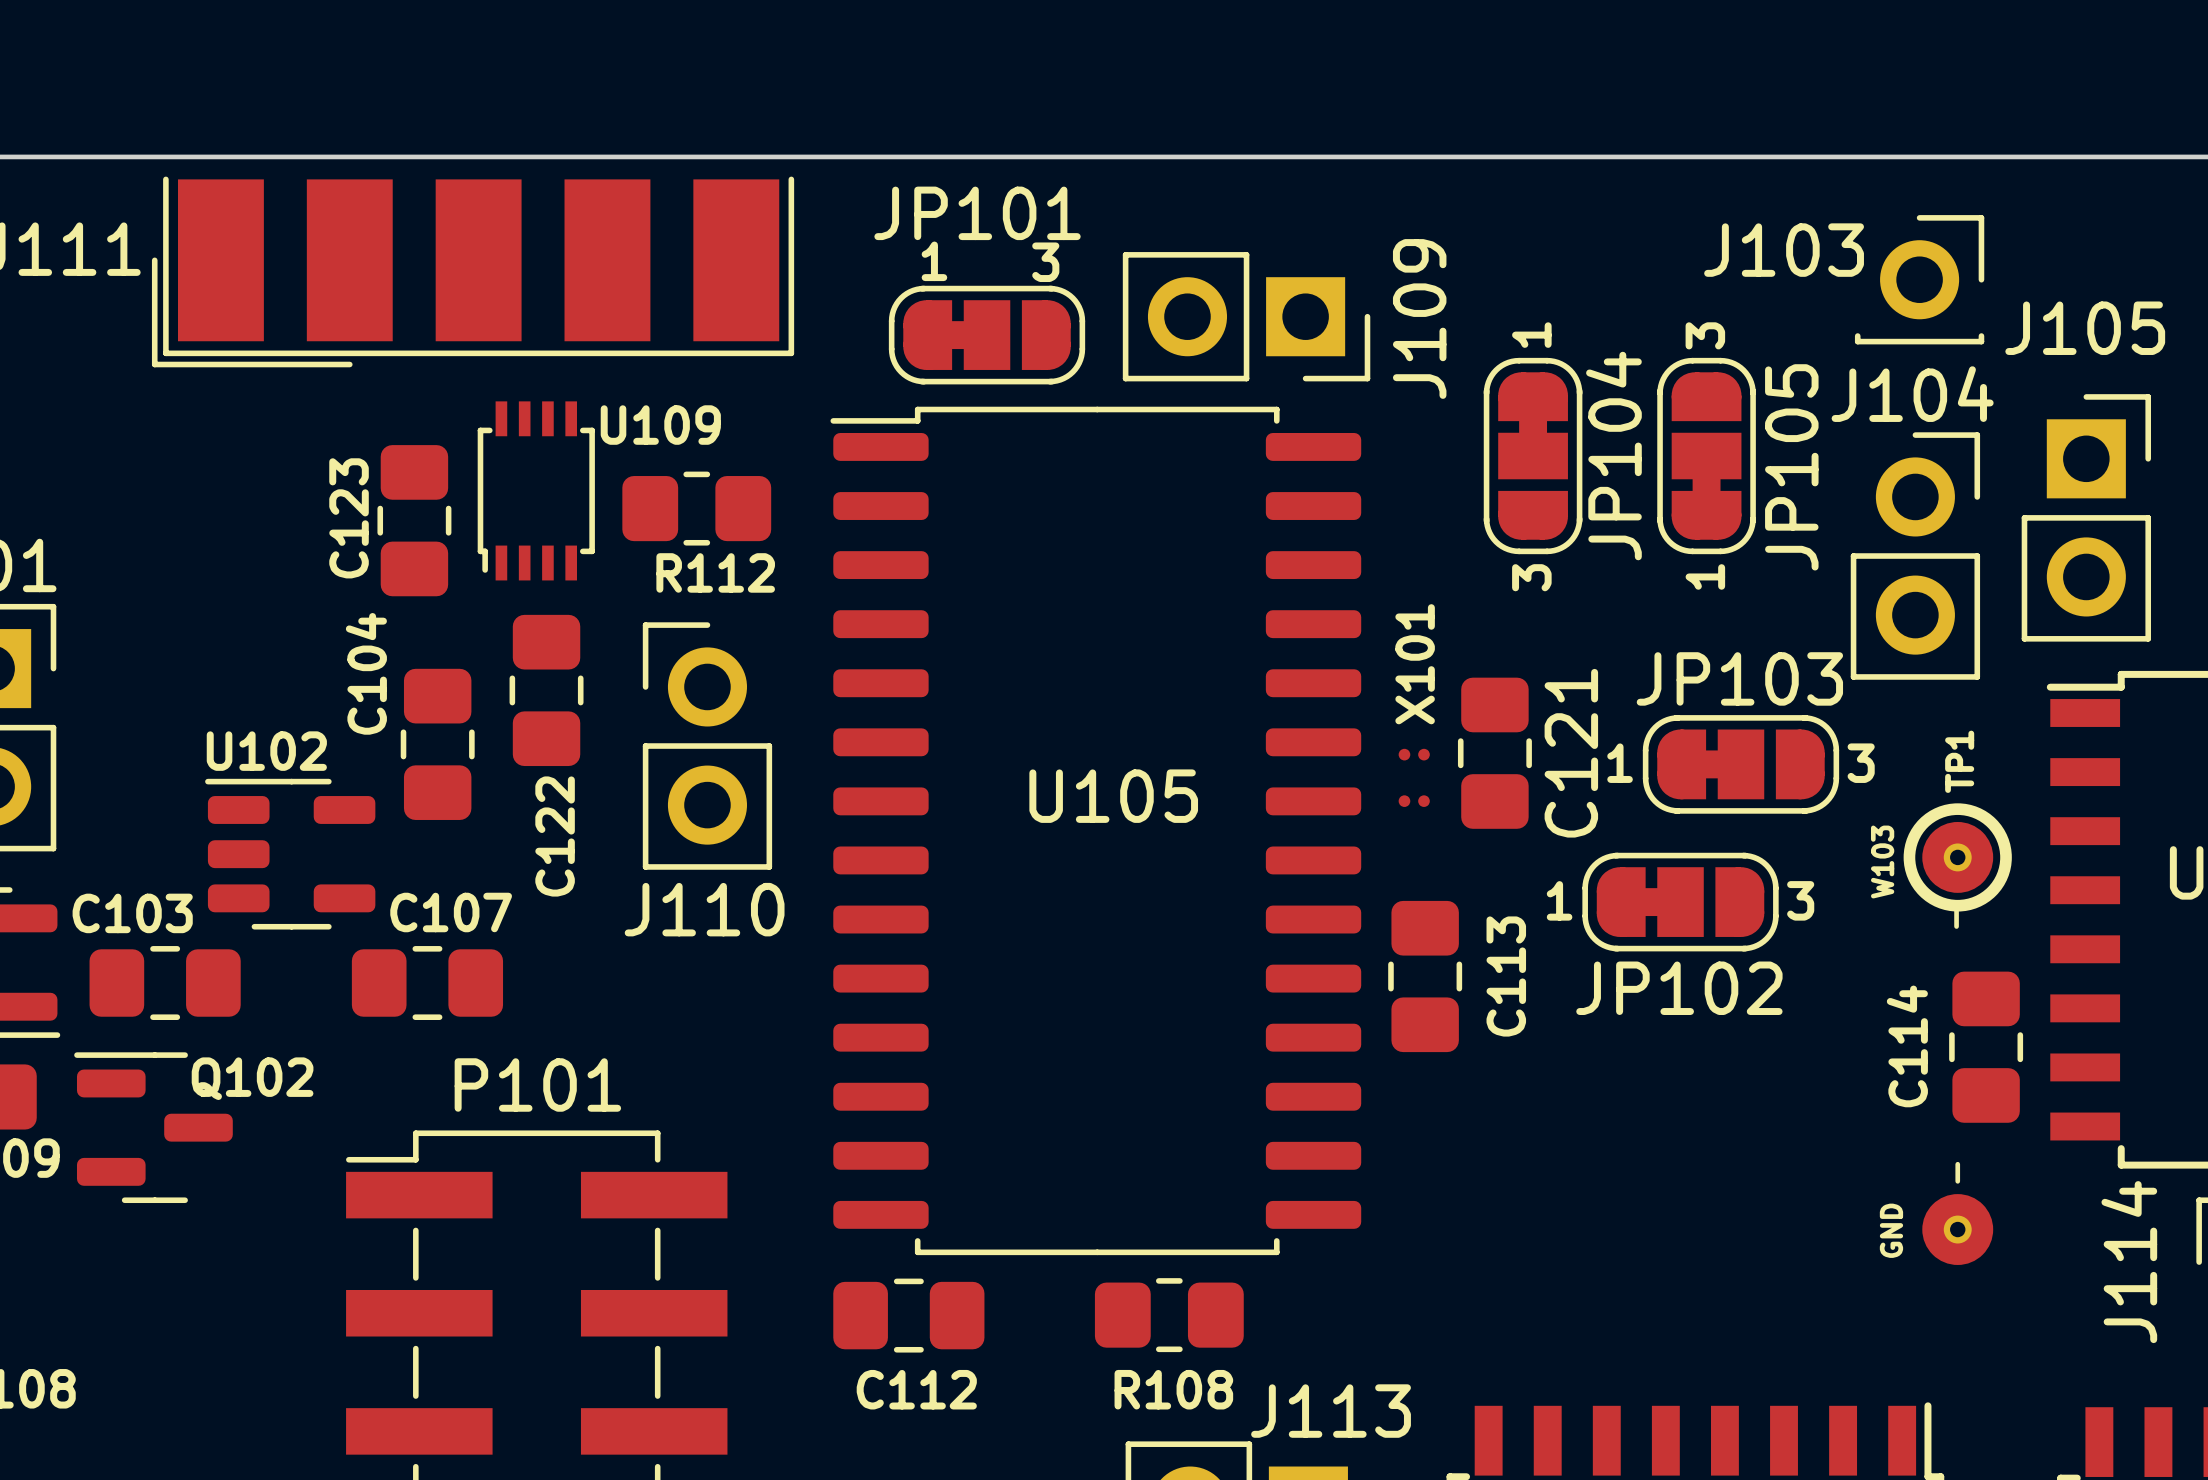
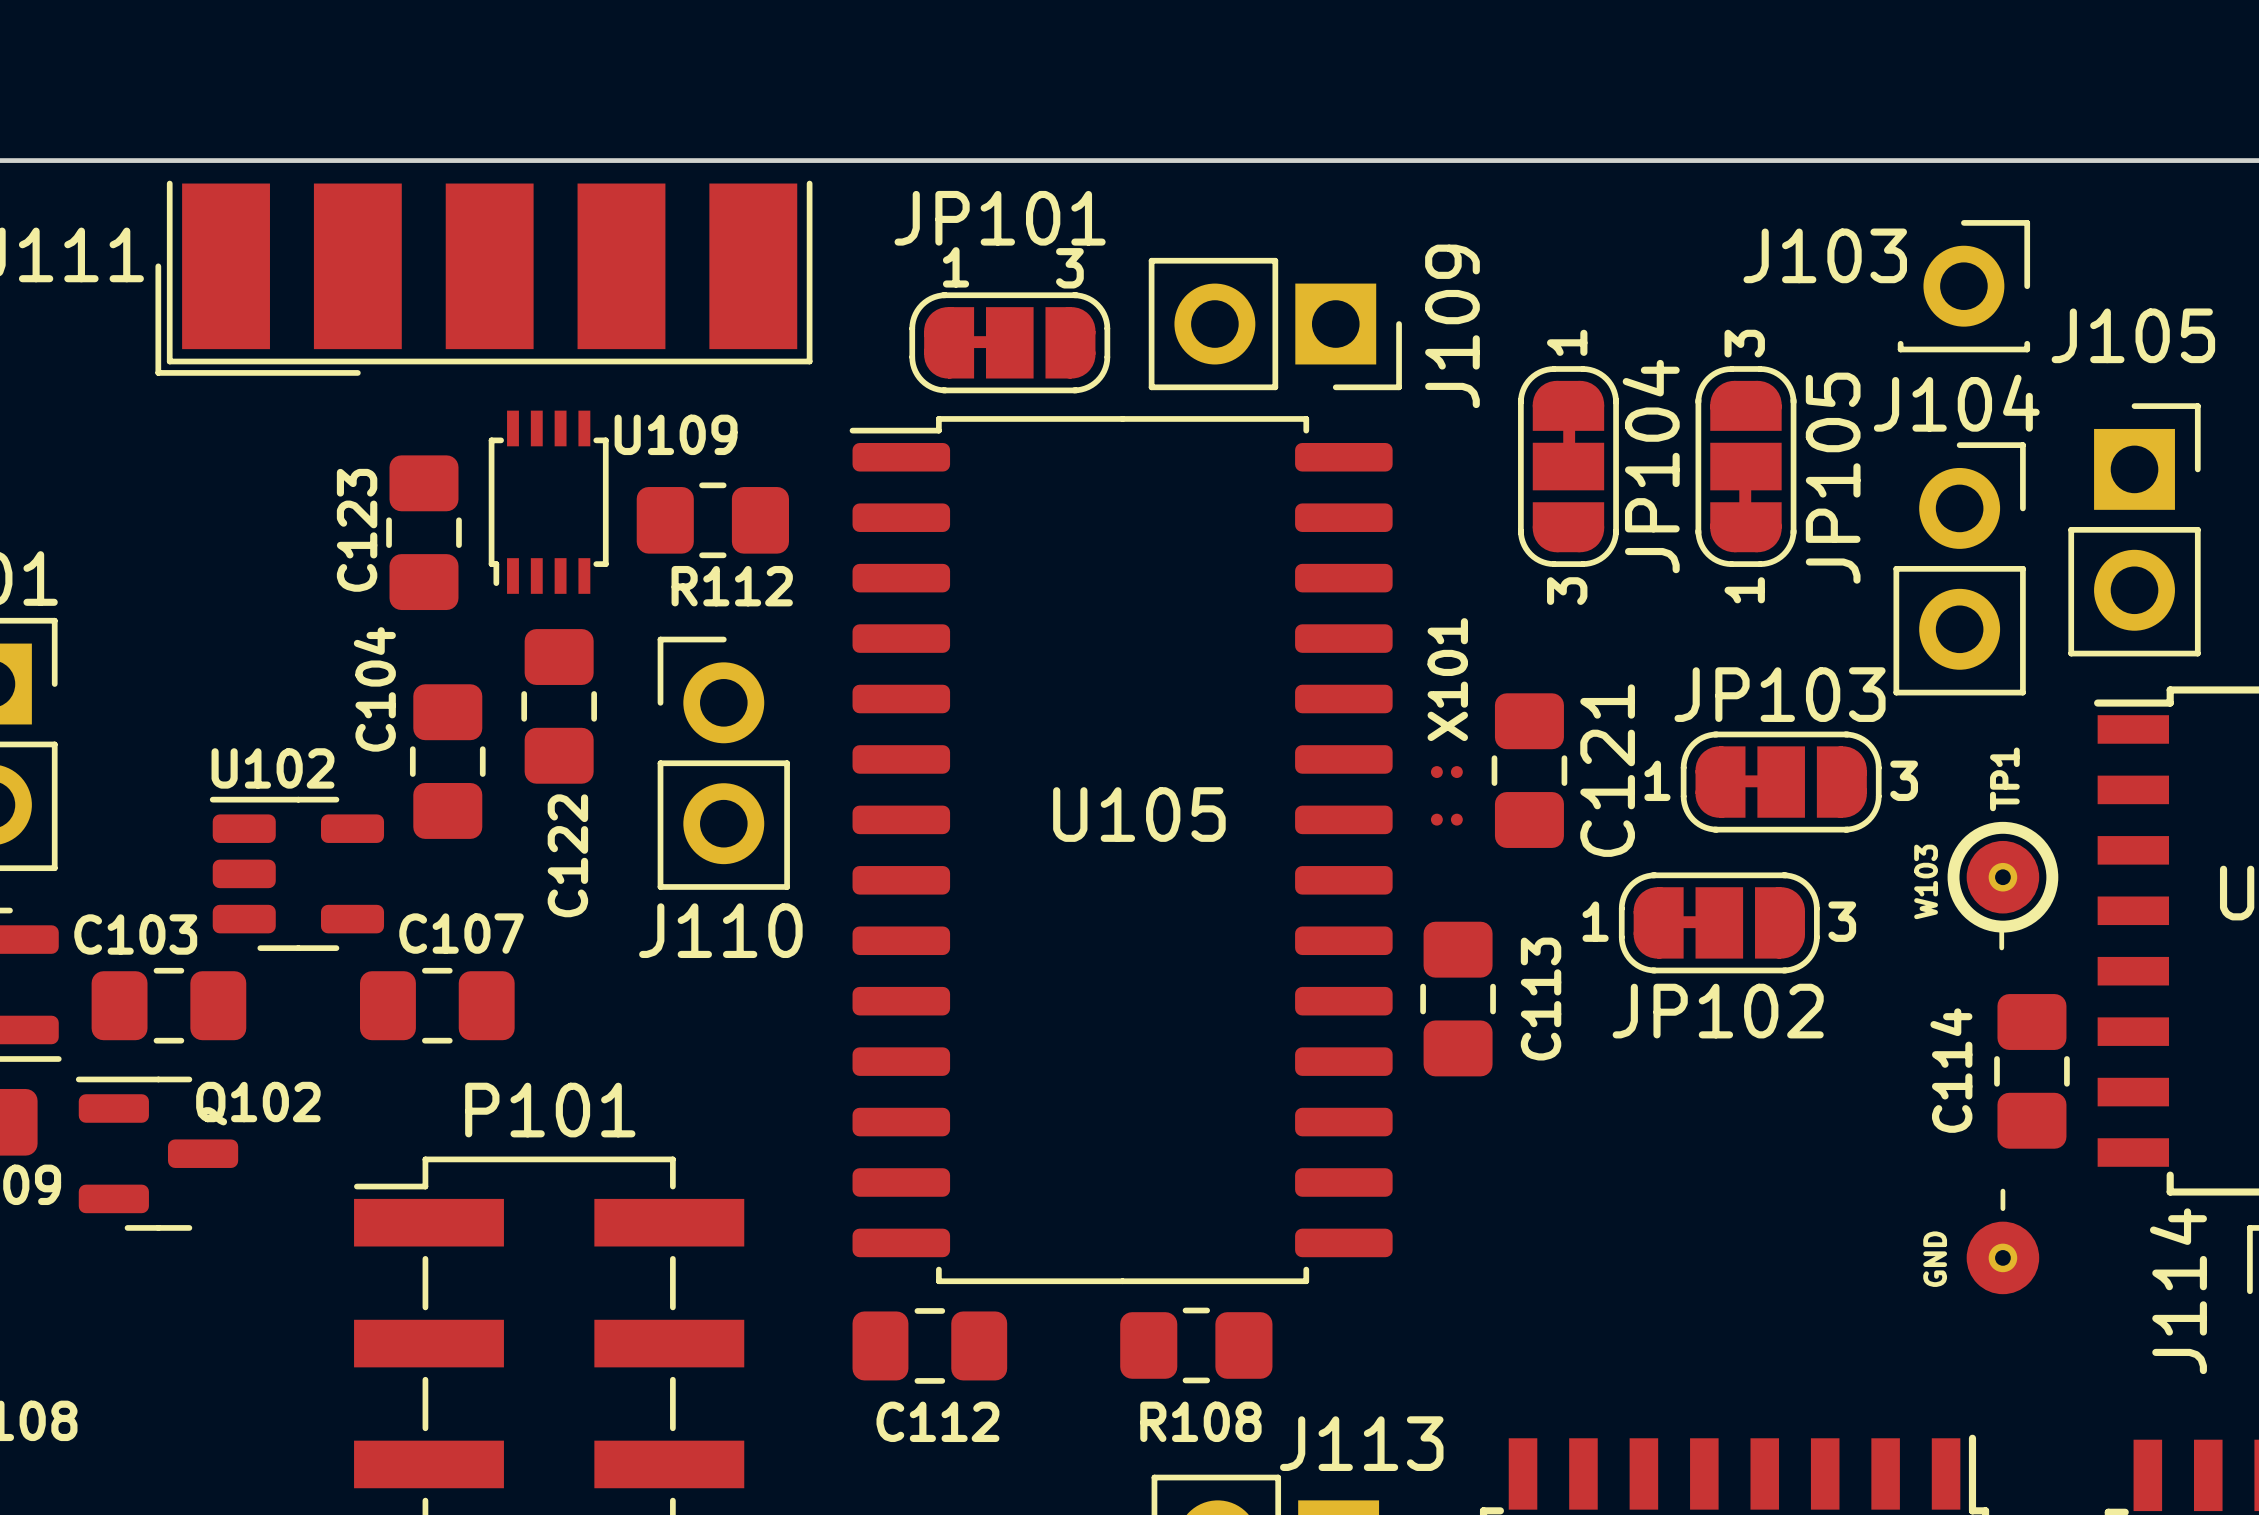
JP101 footprint: [888, 285, 1086, 385] -> [909, 292, 1111, 394]
JP104 footprint: [1483, 357, 1583, 555] -> [1518, 366, 1619, 567]
JP105 footprint: [1657, 357, 1756, 555] -> [1695, 366, 1797, 567]
JP103 footprint: [1642, 715, 1840, 814] -> [1680, 731, 1882, 833]
JP102 footprint: [1582, 852, 1779, 952] -> [1618, 872, 1820, 974]

